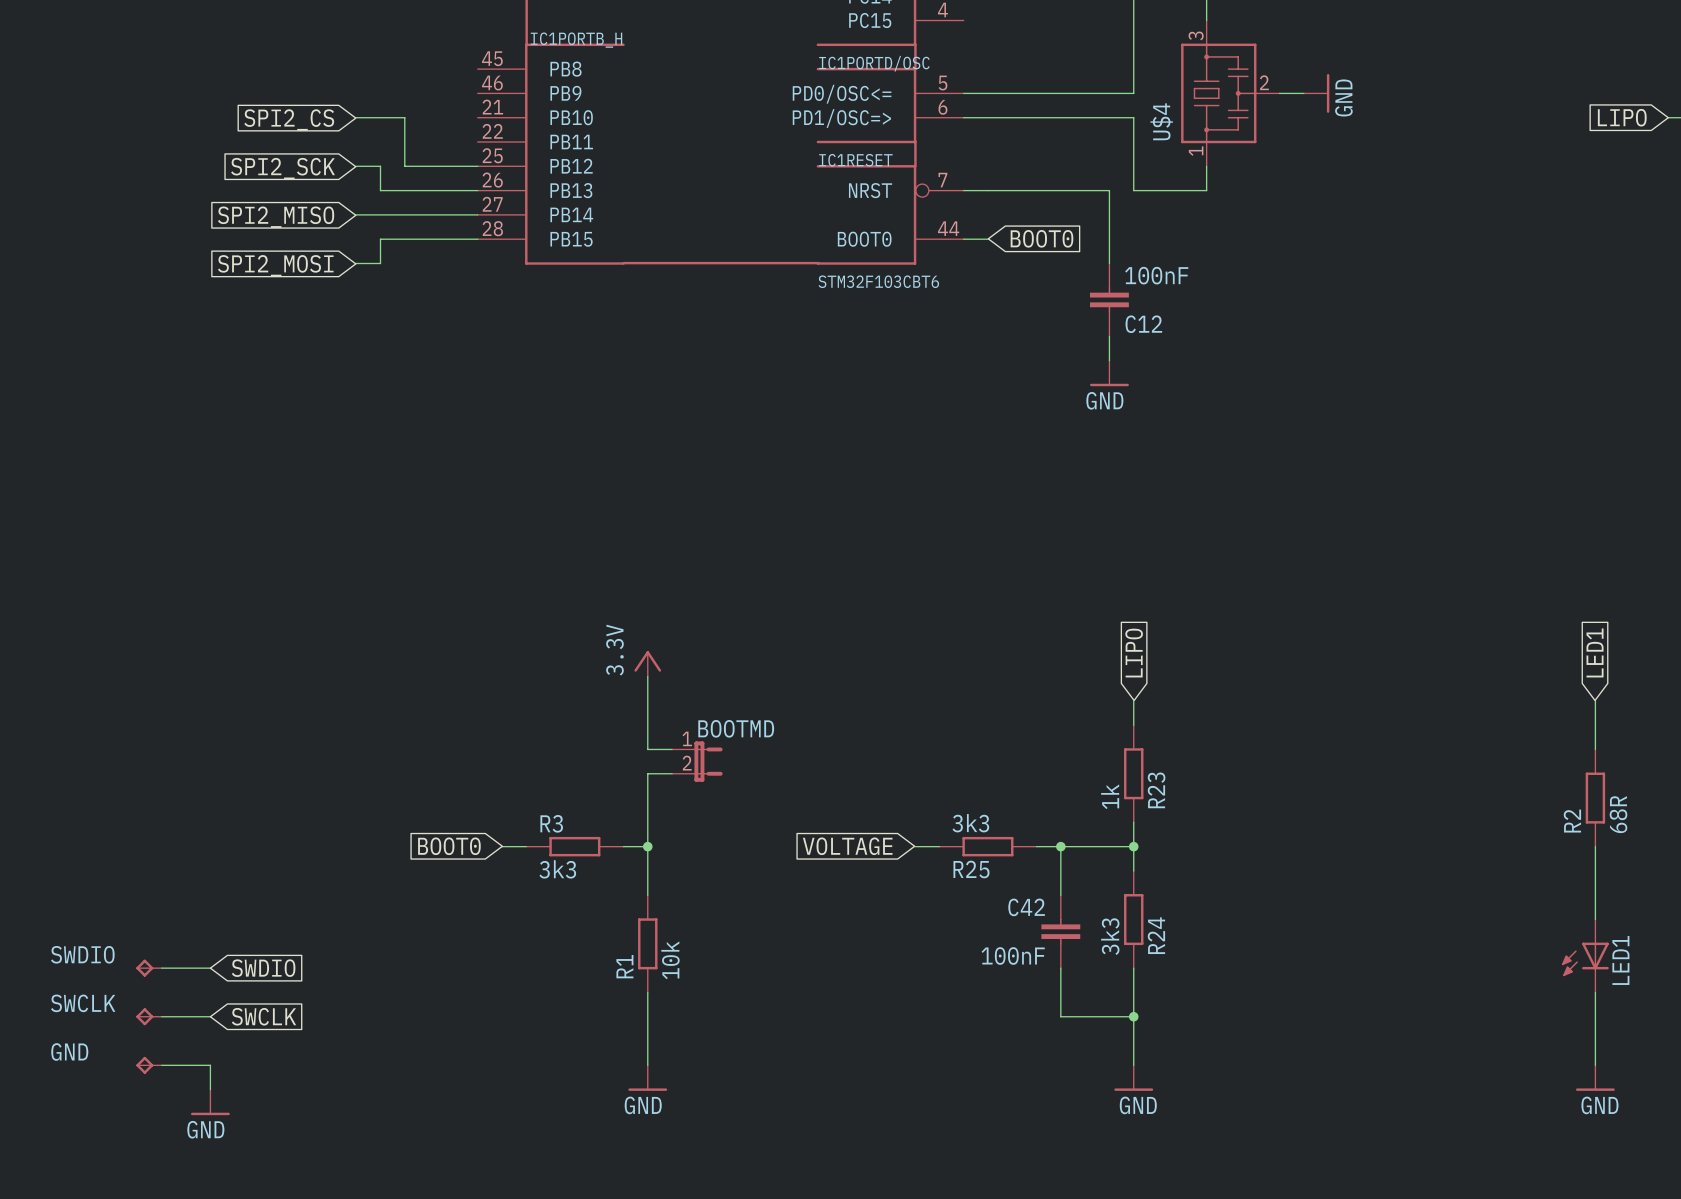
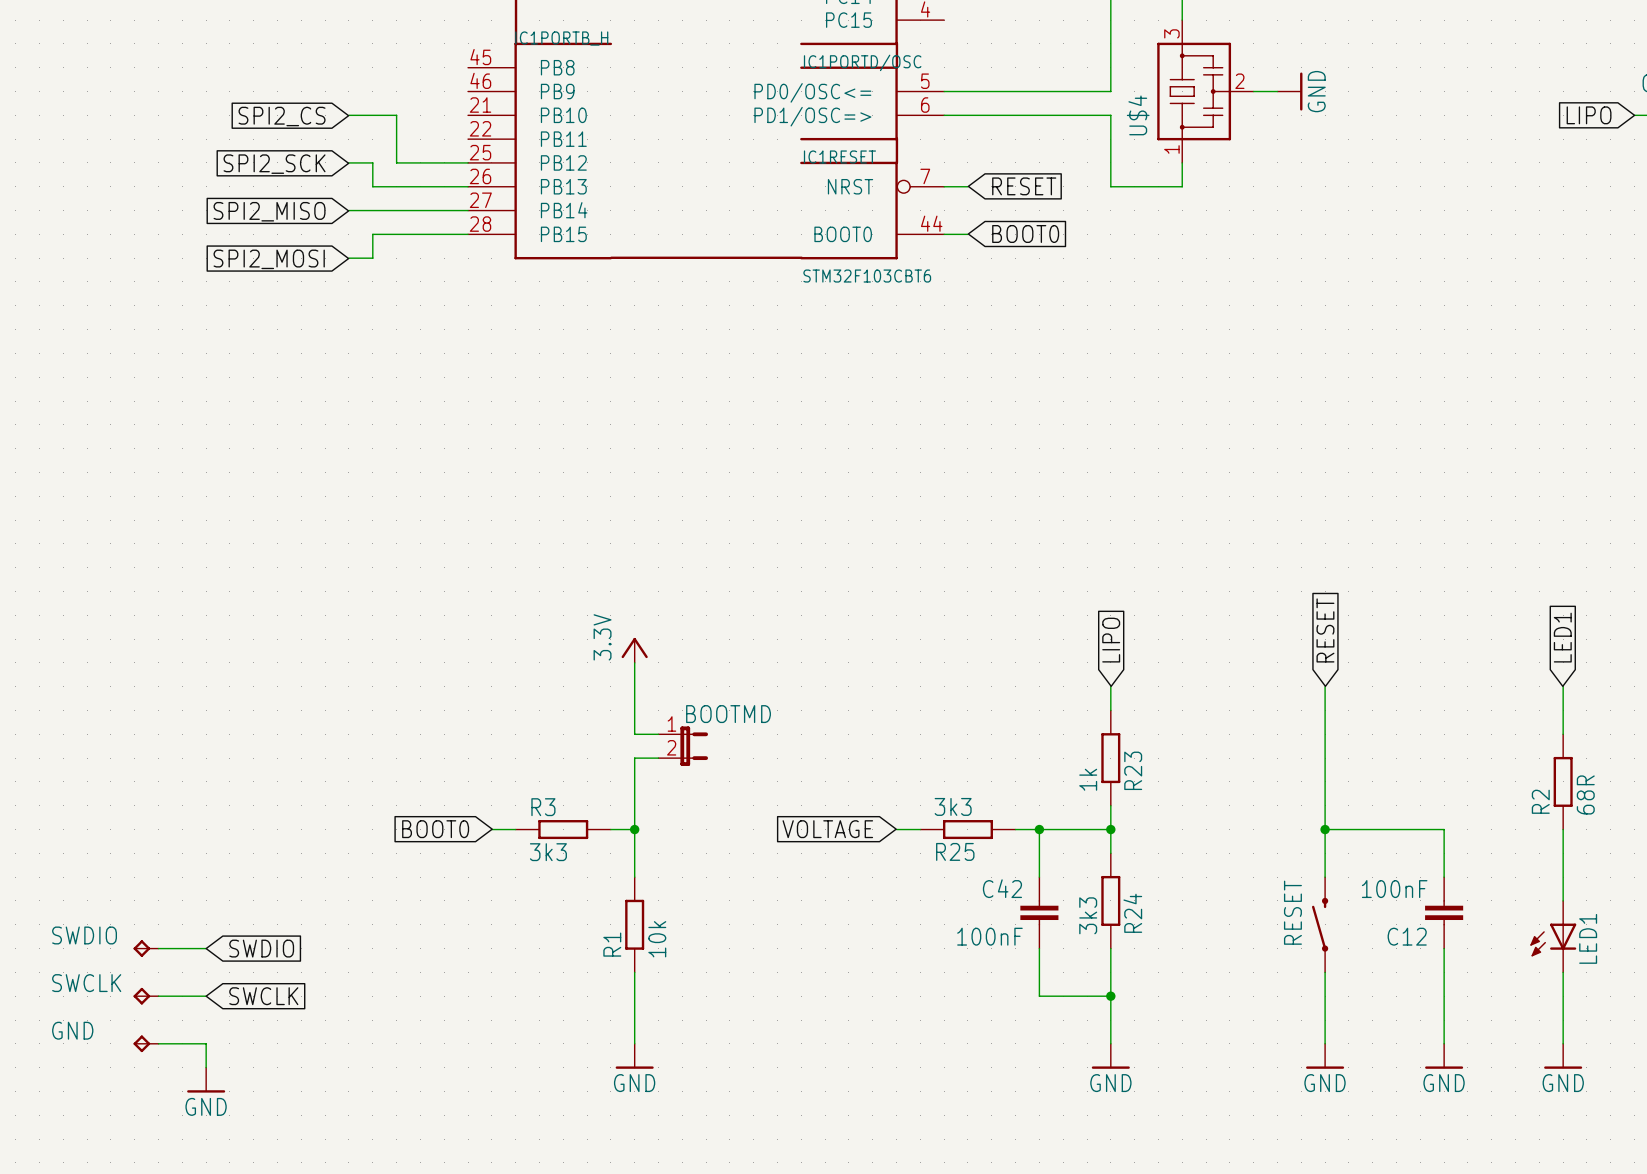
wire: (987, 190) (1109, 190) (1109, 263) -> none
global label: none -> RESET (1024, 186)
C12 value position: 100nF (1156, 275) -> 100nF (1394, 889)
C12 position: (1109, 299) -> (1444, 912)
C12 name position: C12 (1143, 324) -> C12 (1407, 936)
wire: (1109, 336) (1109, 360) -> none
power symbol: GND (1109, 373) -> none
global label: none -> RESET (1325, 630)
wire: none -> (1325, 686) (1325, 877)
wire: none -> (1325, 829) (1444, 829) (1444, 877)
junction: none -> (1325, 829)
RESET: none -> (1320, 924)
wire: none -> (1444, 948) (1444, 1043)
wire: none -> (1325, 972) (1325, 1043)
power symbol: none -> GND (1325, 1056)
power symbol: none -> GND (1444, 1056)

